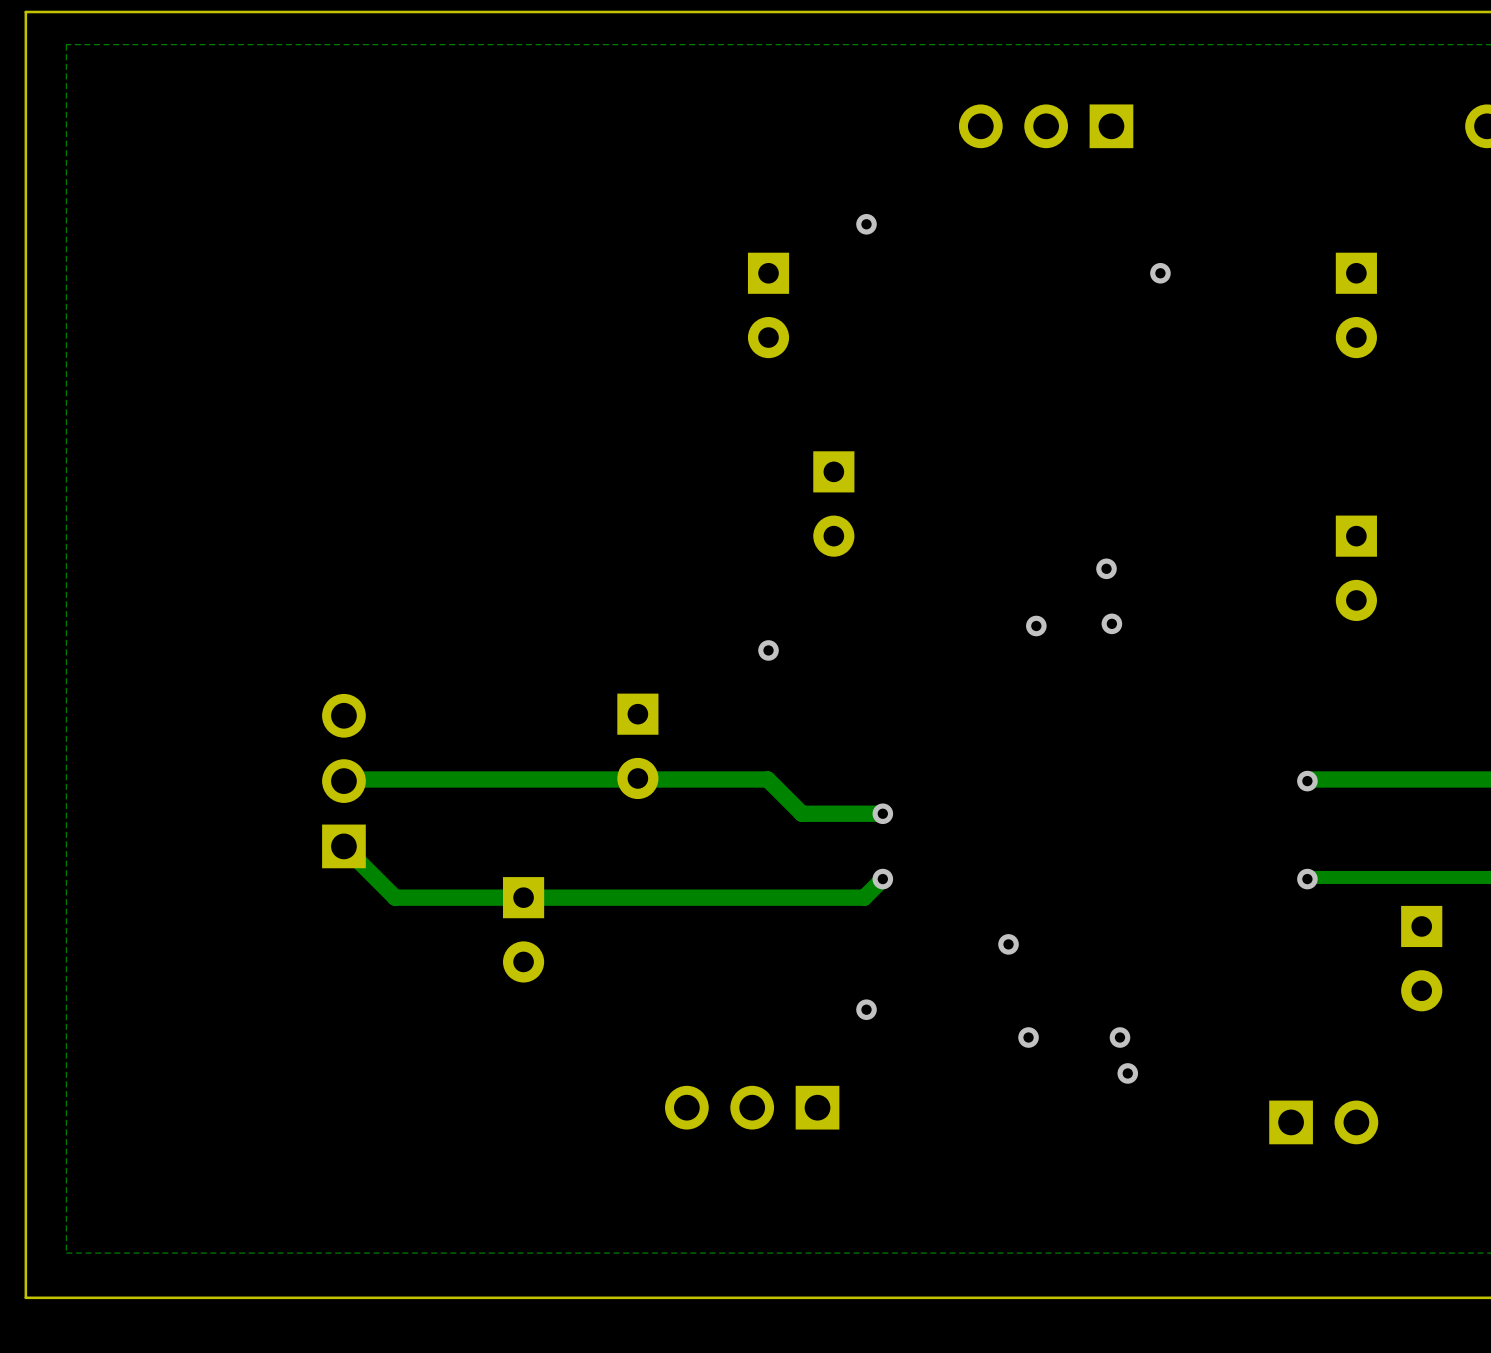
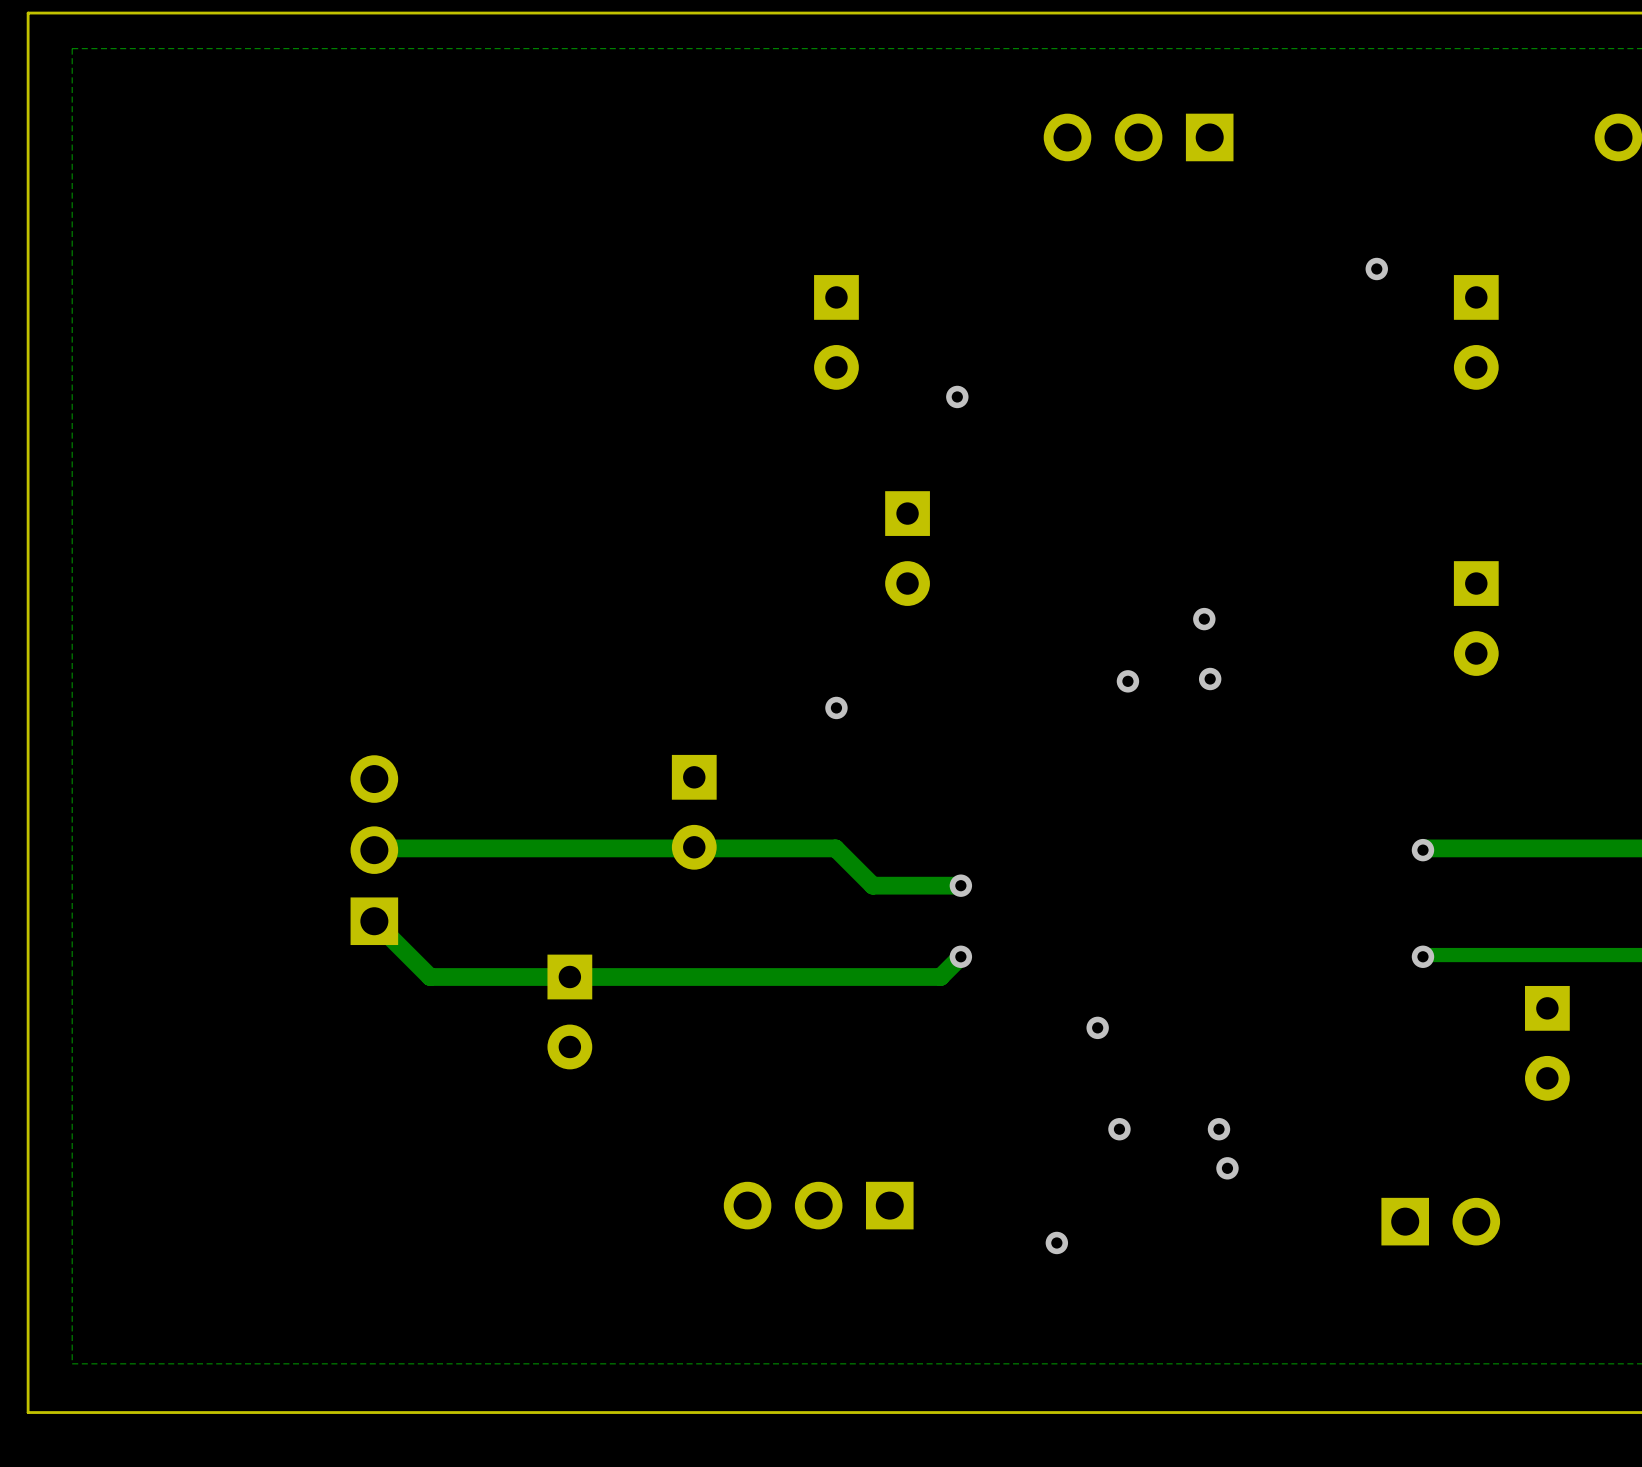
via position: (866, 224) -> (957, 396)
via position: (1160, 273) -> (1376, 268)
via: (866, 1009) -> none
via: none -> (1056, 1242)

